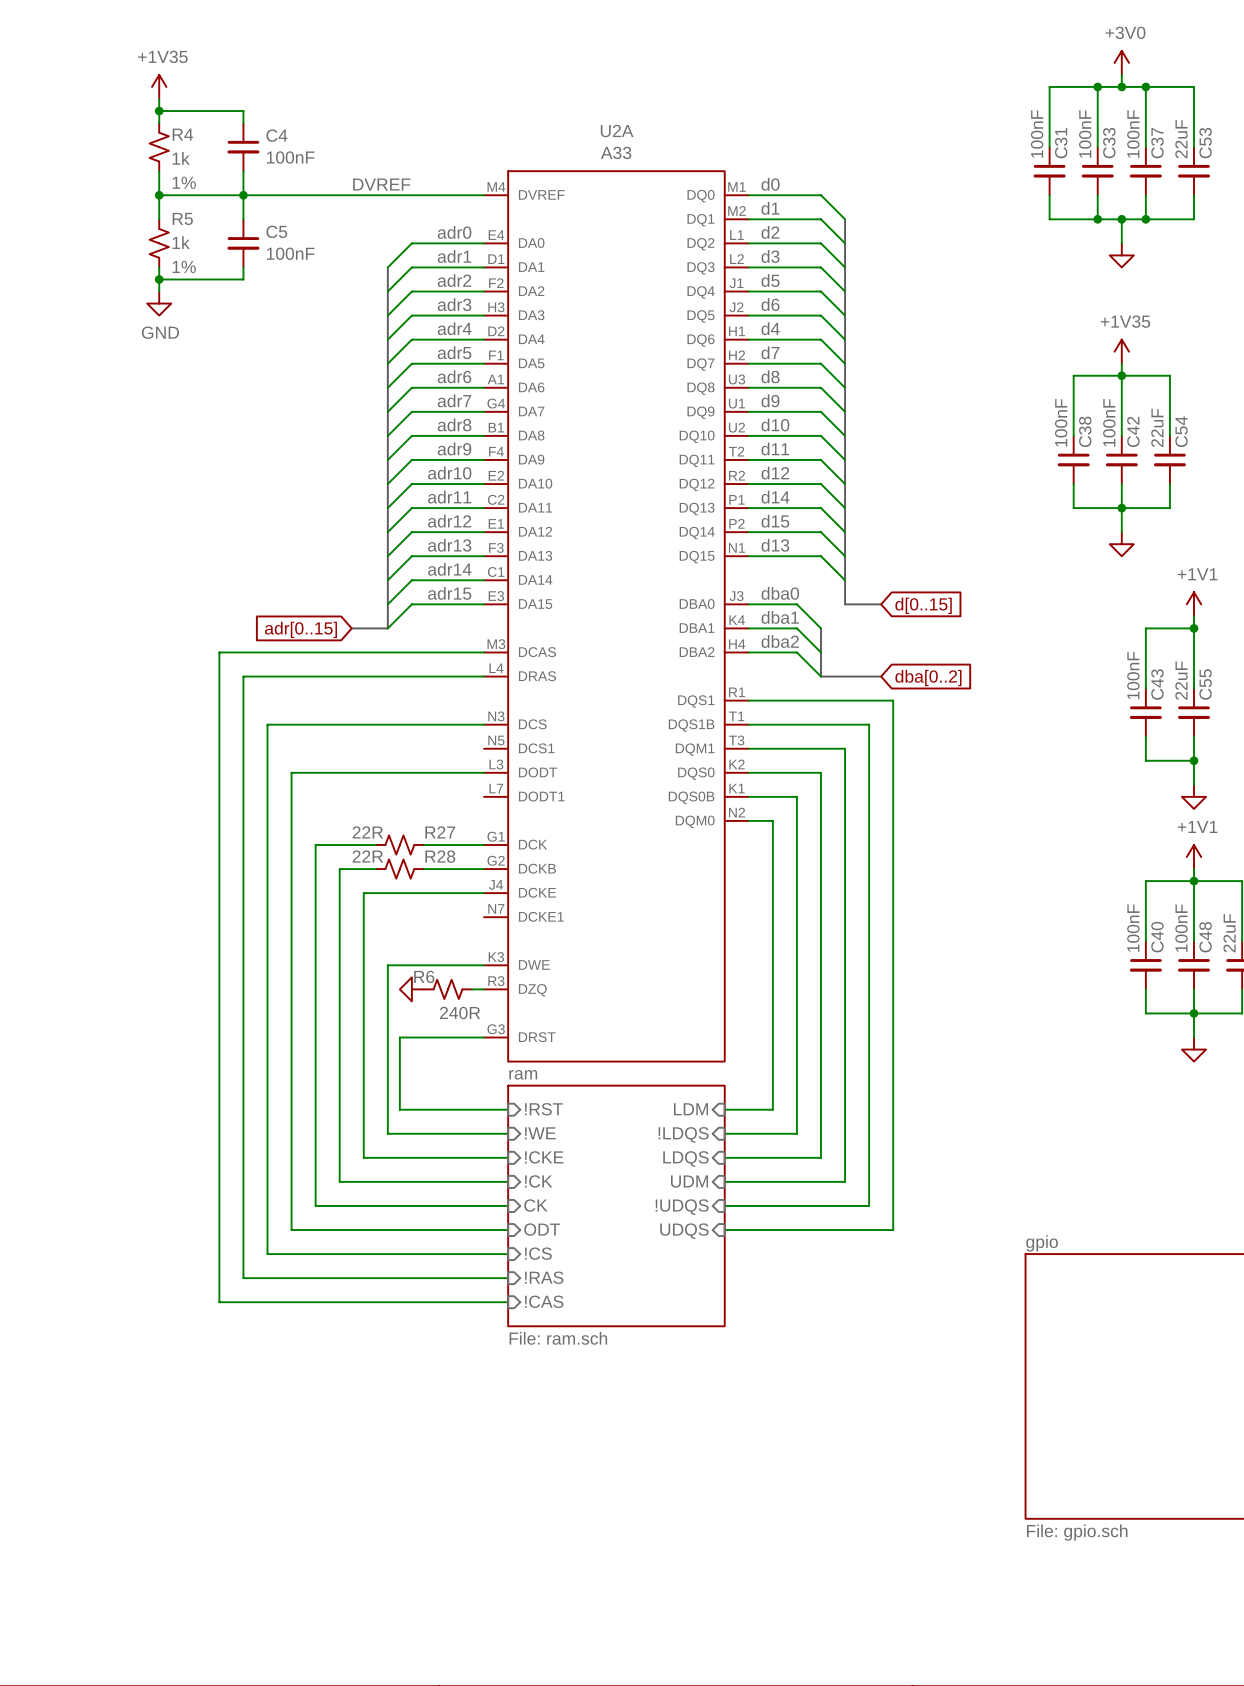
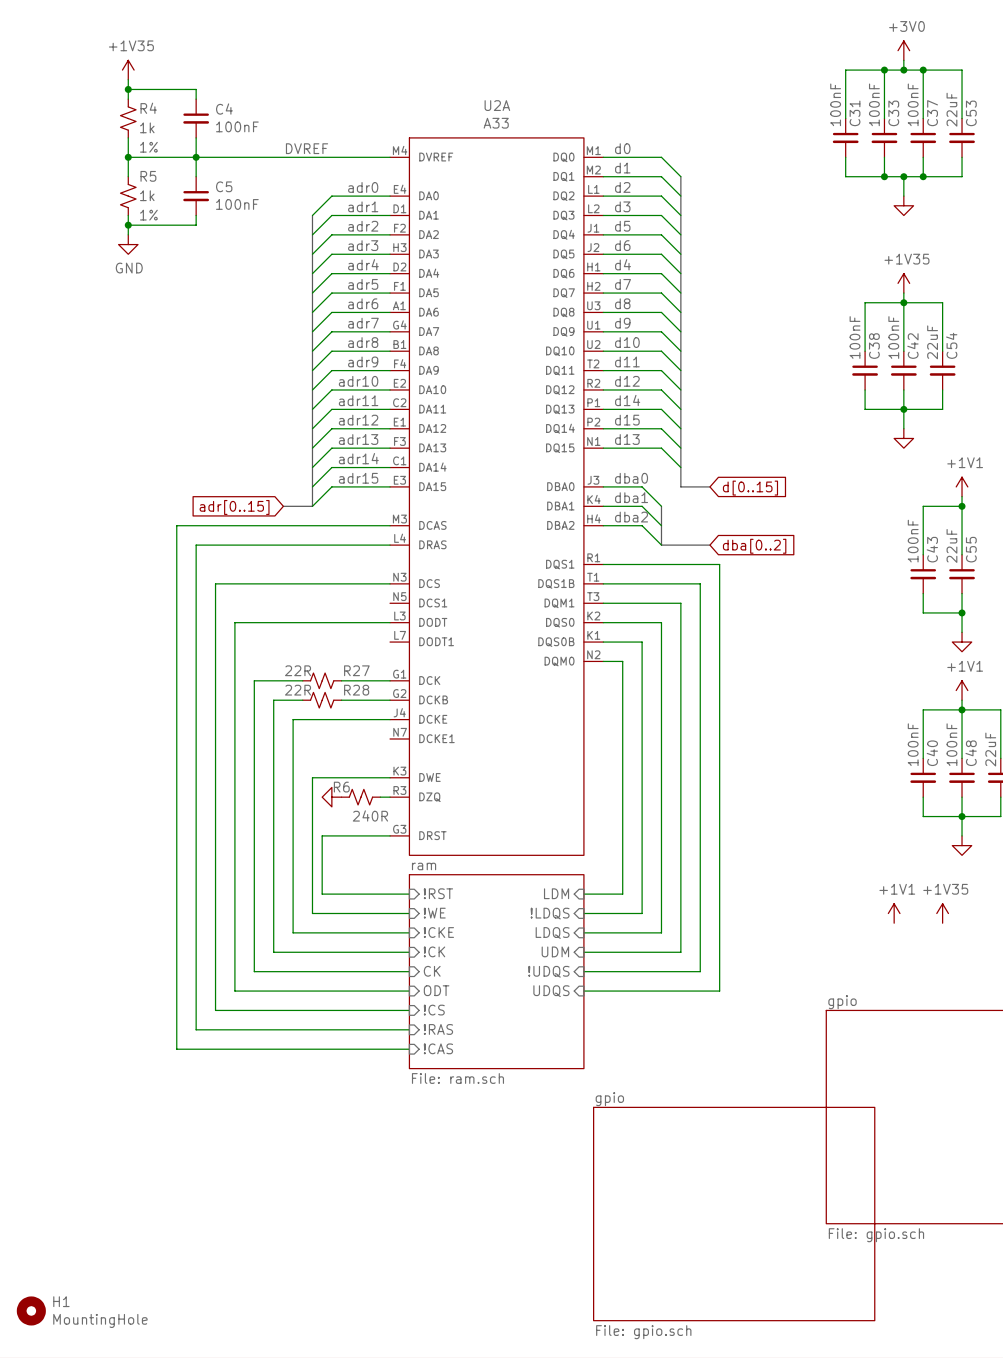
power symbol: none -> +1V1 (894, 913)
power symbol: none -> +1V35 (942, 913)
sheet gpio: none -> File: gpio.sch (734, 1214)
H1: none -> MountingHole (31, 1310)

